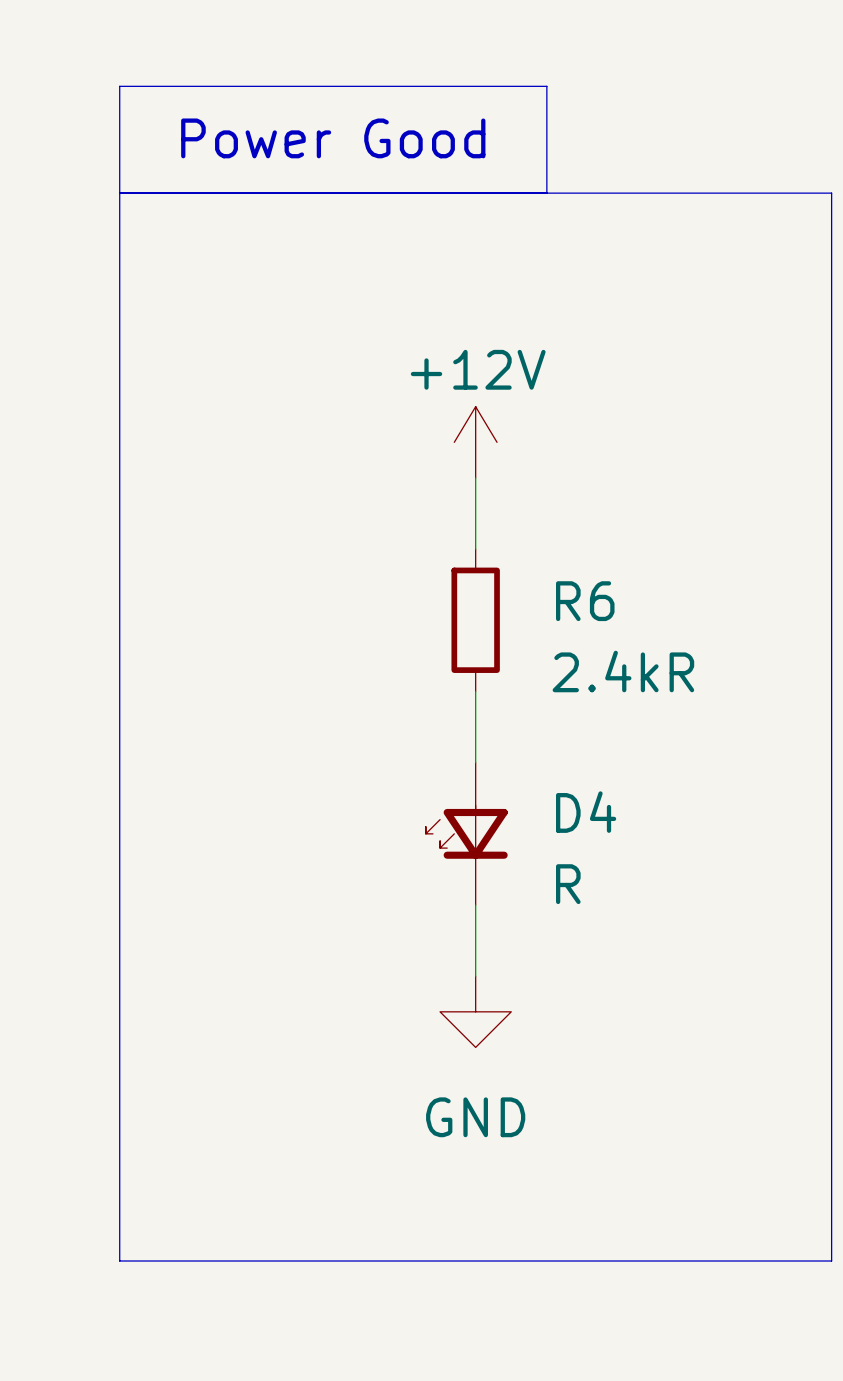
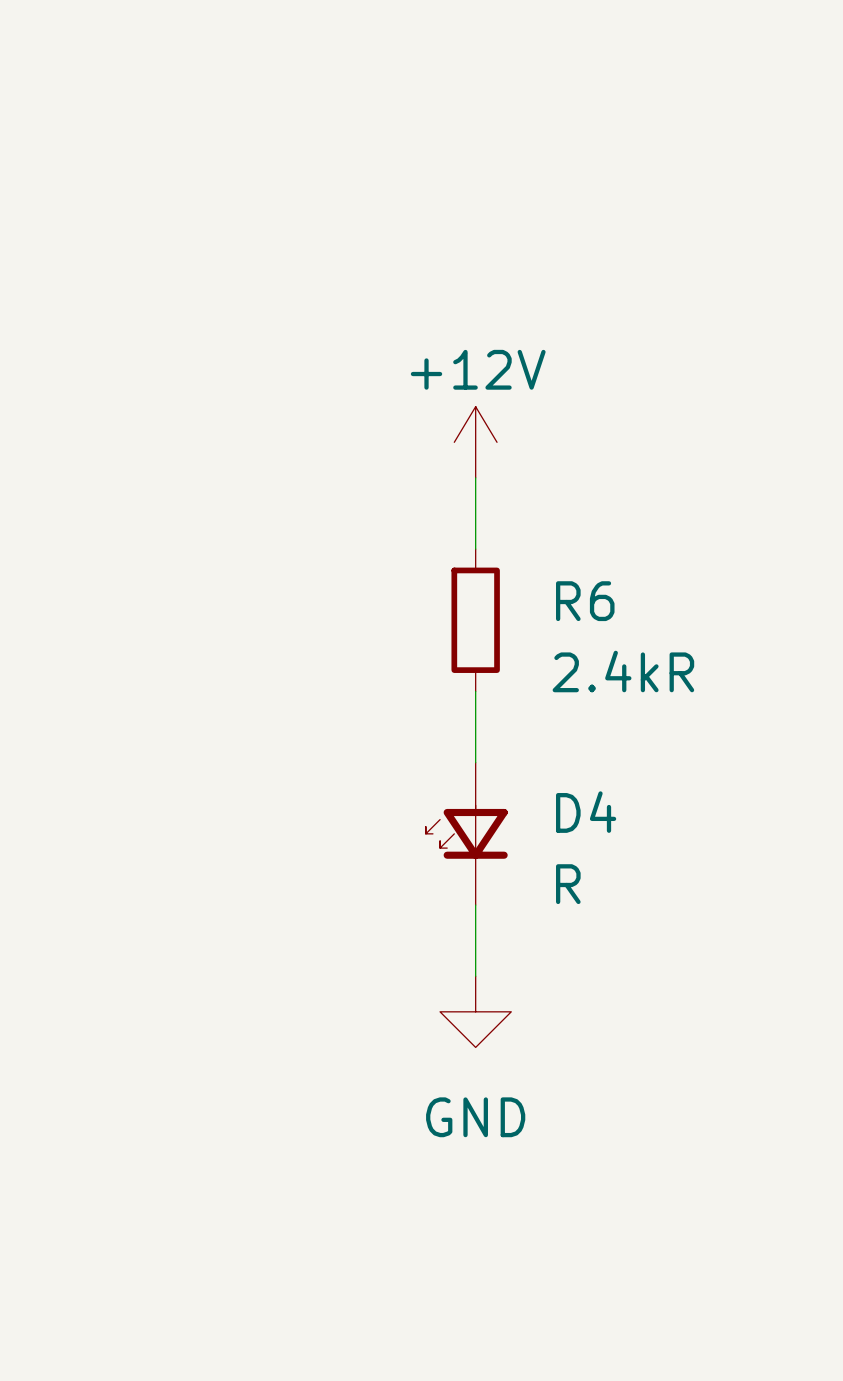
text: Power Good (333, 138) -> none
line: (119, 193) (831, 193) (831, 1261) (119, 1261) (119, 86) (546, 86) (546, 193) -> none

